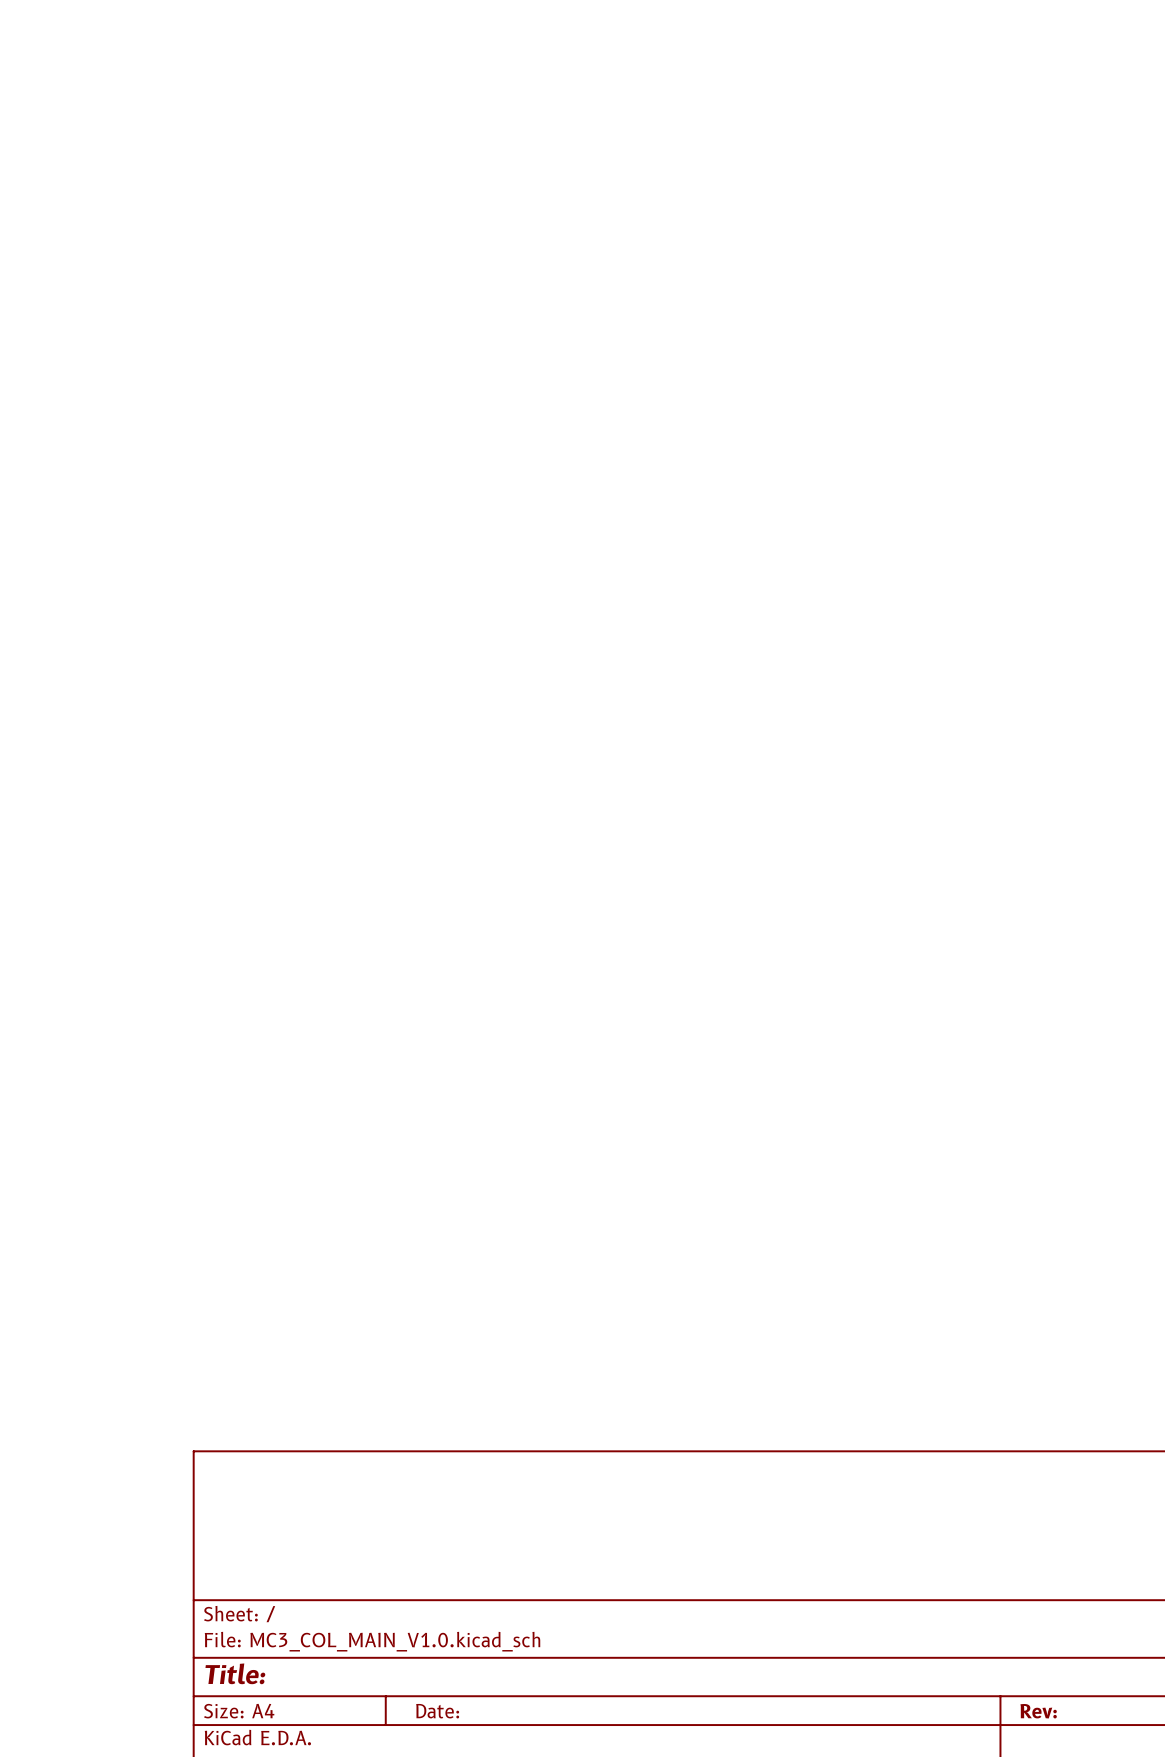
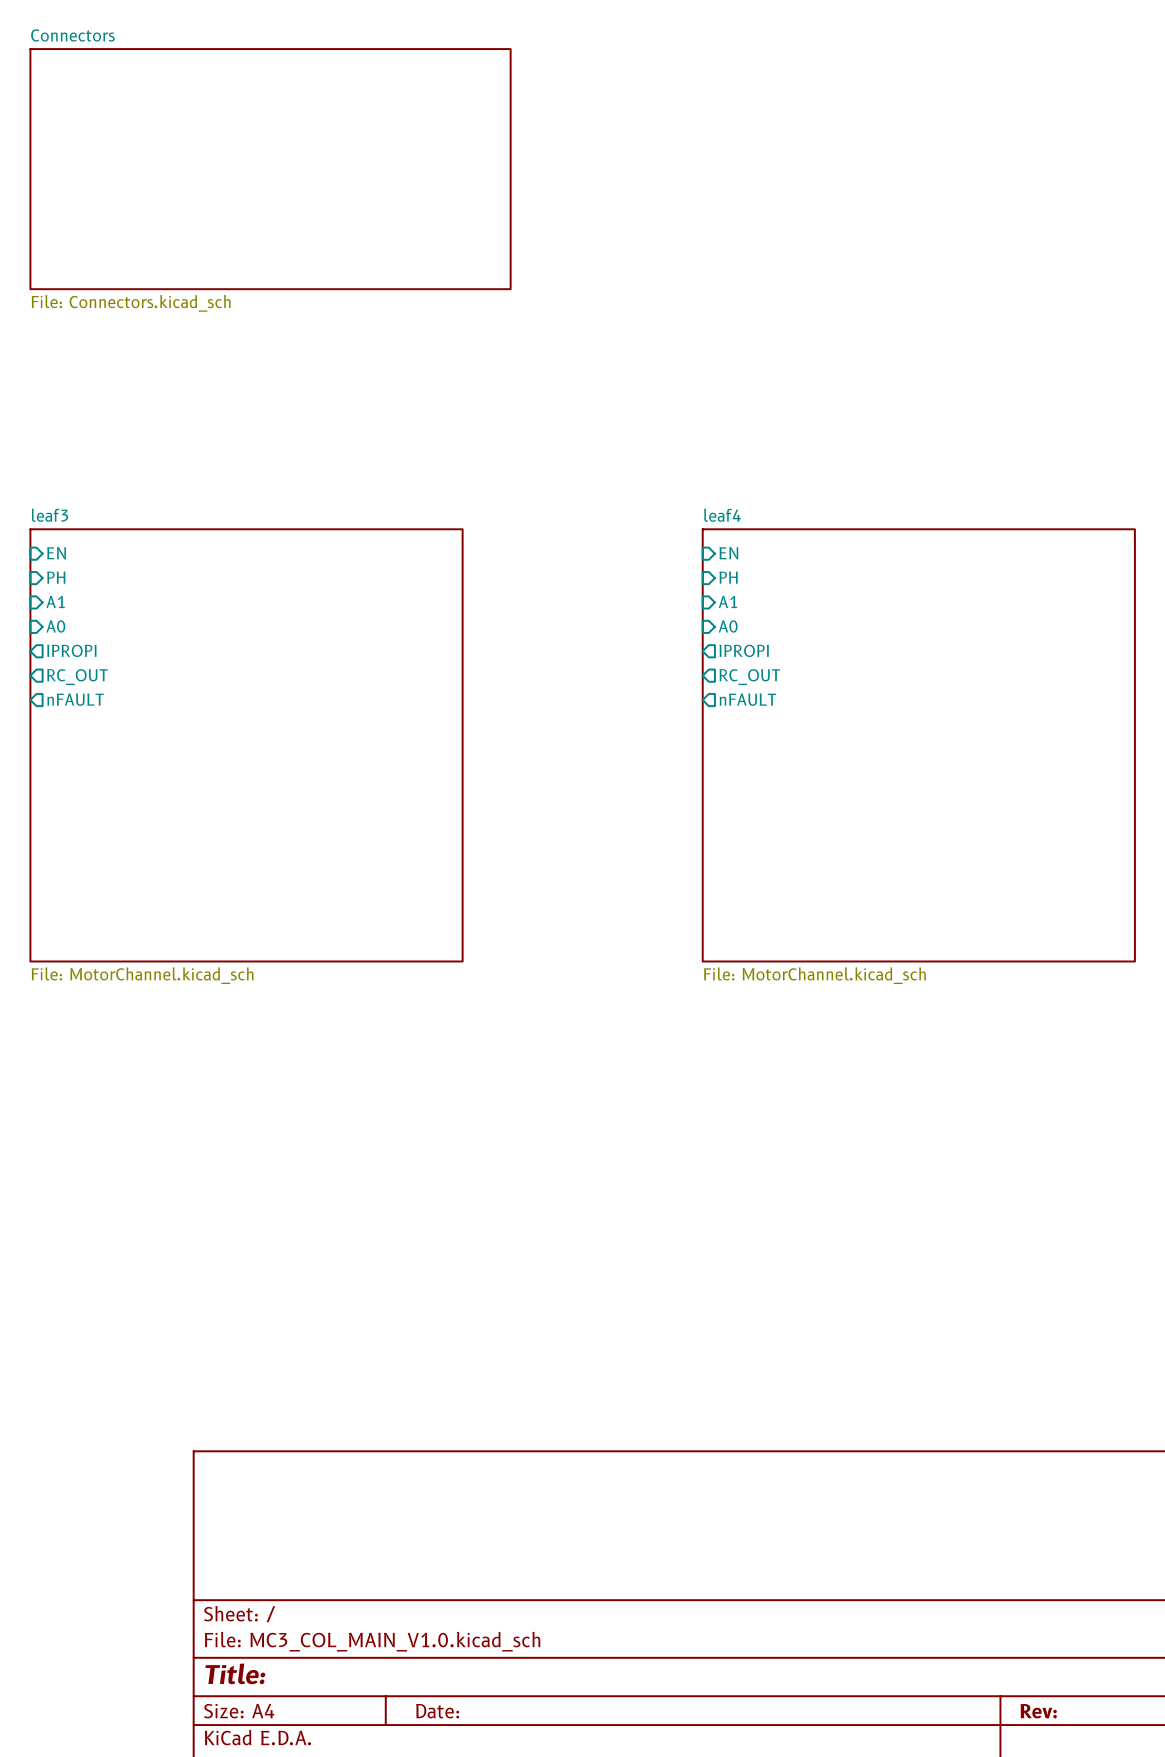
sheet Connectors: none -> File: Connectors.kicad_sch (270, 169)
sheet pin: none -> EN (56, 553)
sheet pin: none -> EN (728, 553)
sheet pin: none -> PH (56, 577)
sheet pin: none -> PH (728, 577)
sheet pin: none -> A1 (55, 602)
sheet pin: none -> A1 (727, 602)
sheet pin: none -> A0 (55, 626)
sheet pin: none -> A0 (728, 626)
sheet pin: none -> IPROPI (71, 650)
sheet pin: none -> IPROPI (744, 650)
sheet pin: none -> RC_OUT (77, 677)
sheet pin: none -> RC_OUT (749, 677)
sheet pin: none -> nFAULT (75, 699)
sheet pin: none -> nFAULT (747, 699)
sheet leaf3: none -> File: MotorChannel.kicad_sch (246, 745)
sheet leaf4: none -> File: MotorChannel.kicad_sch (918, 745)

